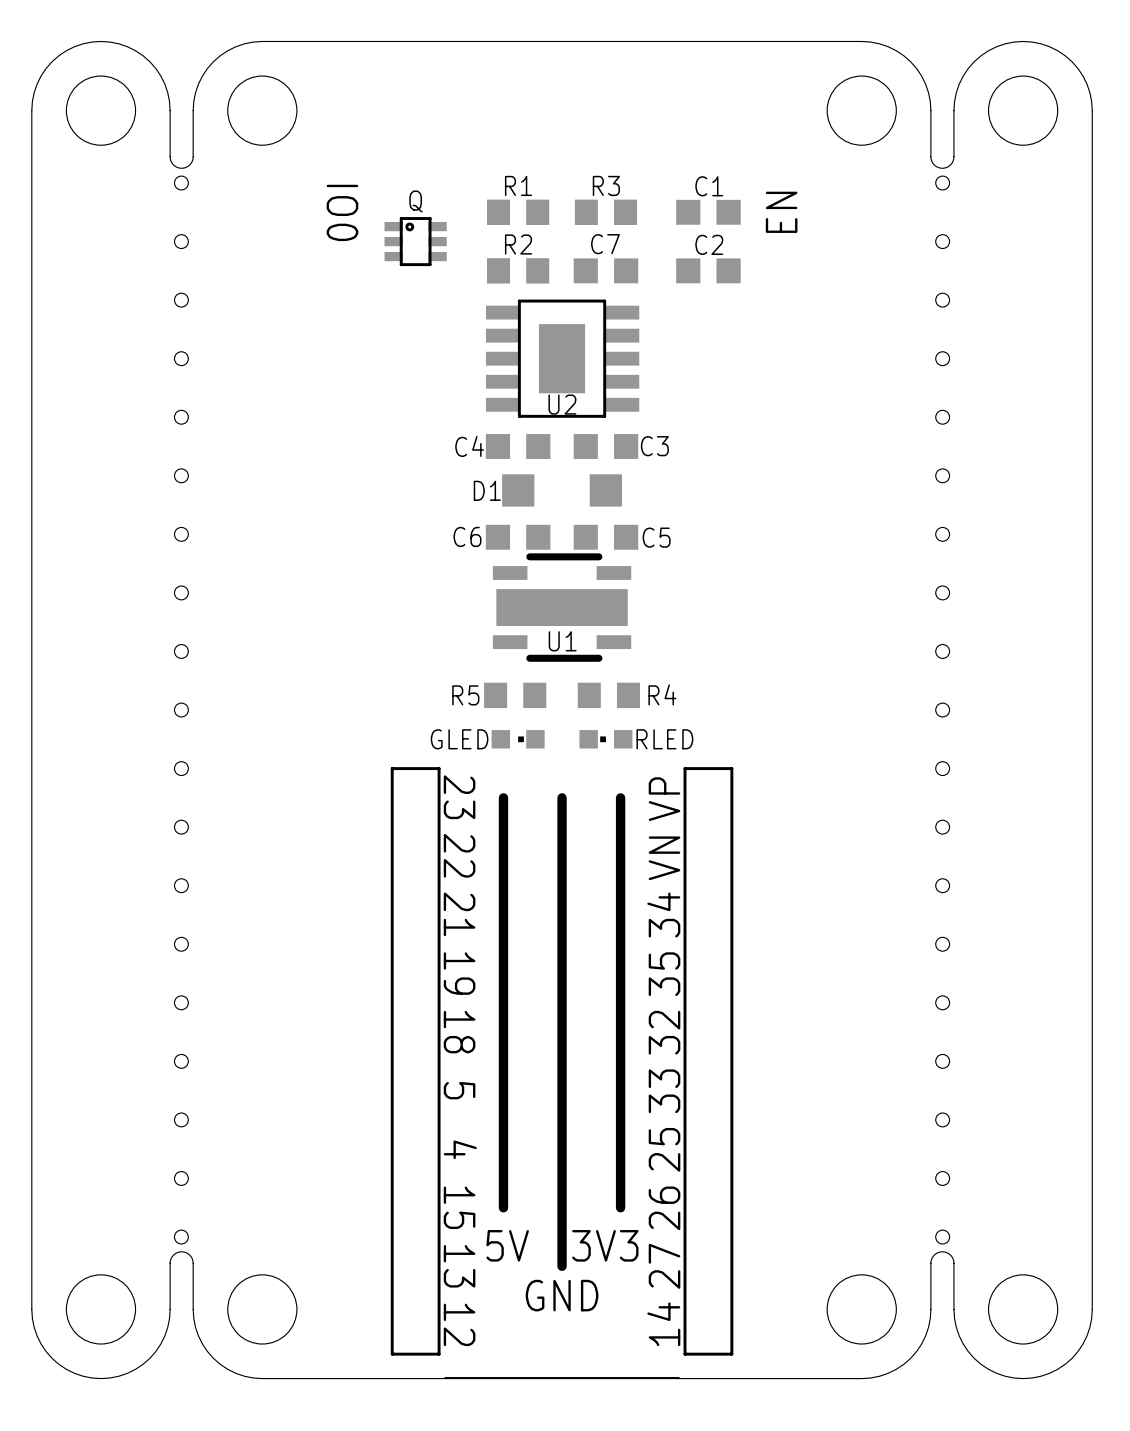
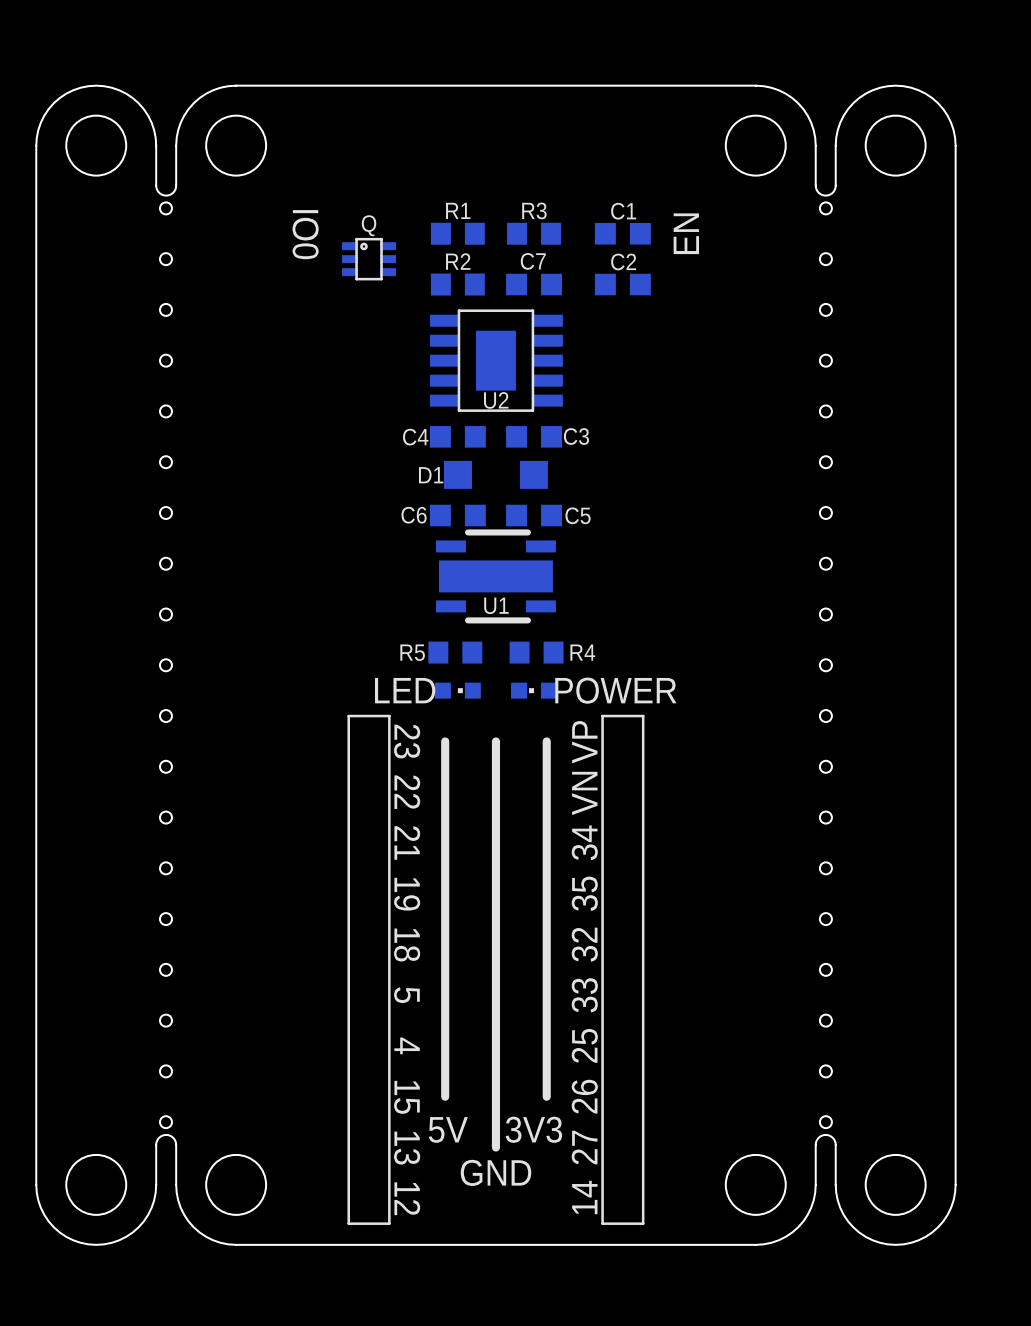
GLED name: GLED (459, 739) -> LED (405, 690)
RLED name: RLED (664, 739) -> POWER (615, 690)
part: (562, 1377) -> none

